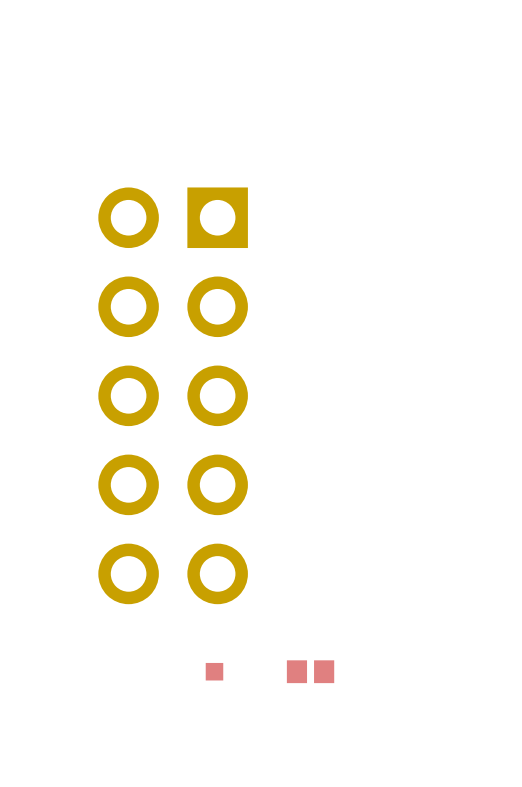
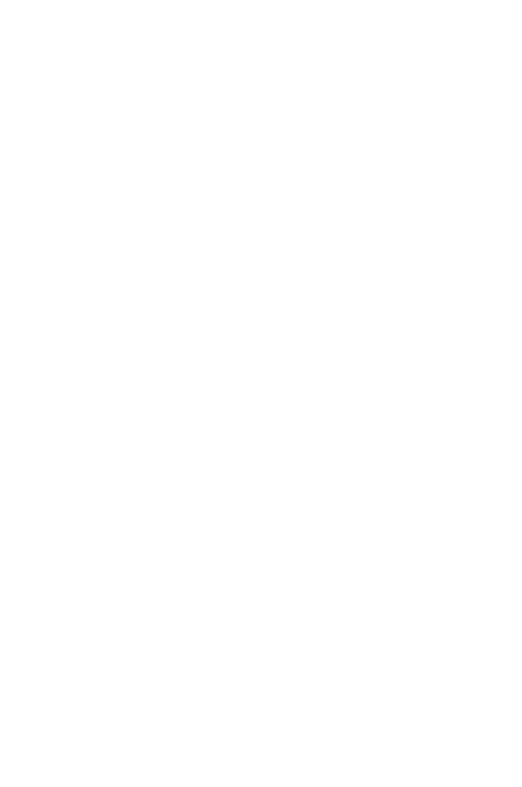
part: (173, 395) -> none
part: (214, 671) -> none
part: (310, 671) -> none

